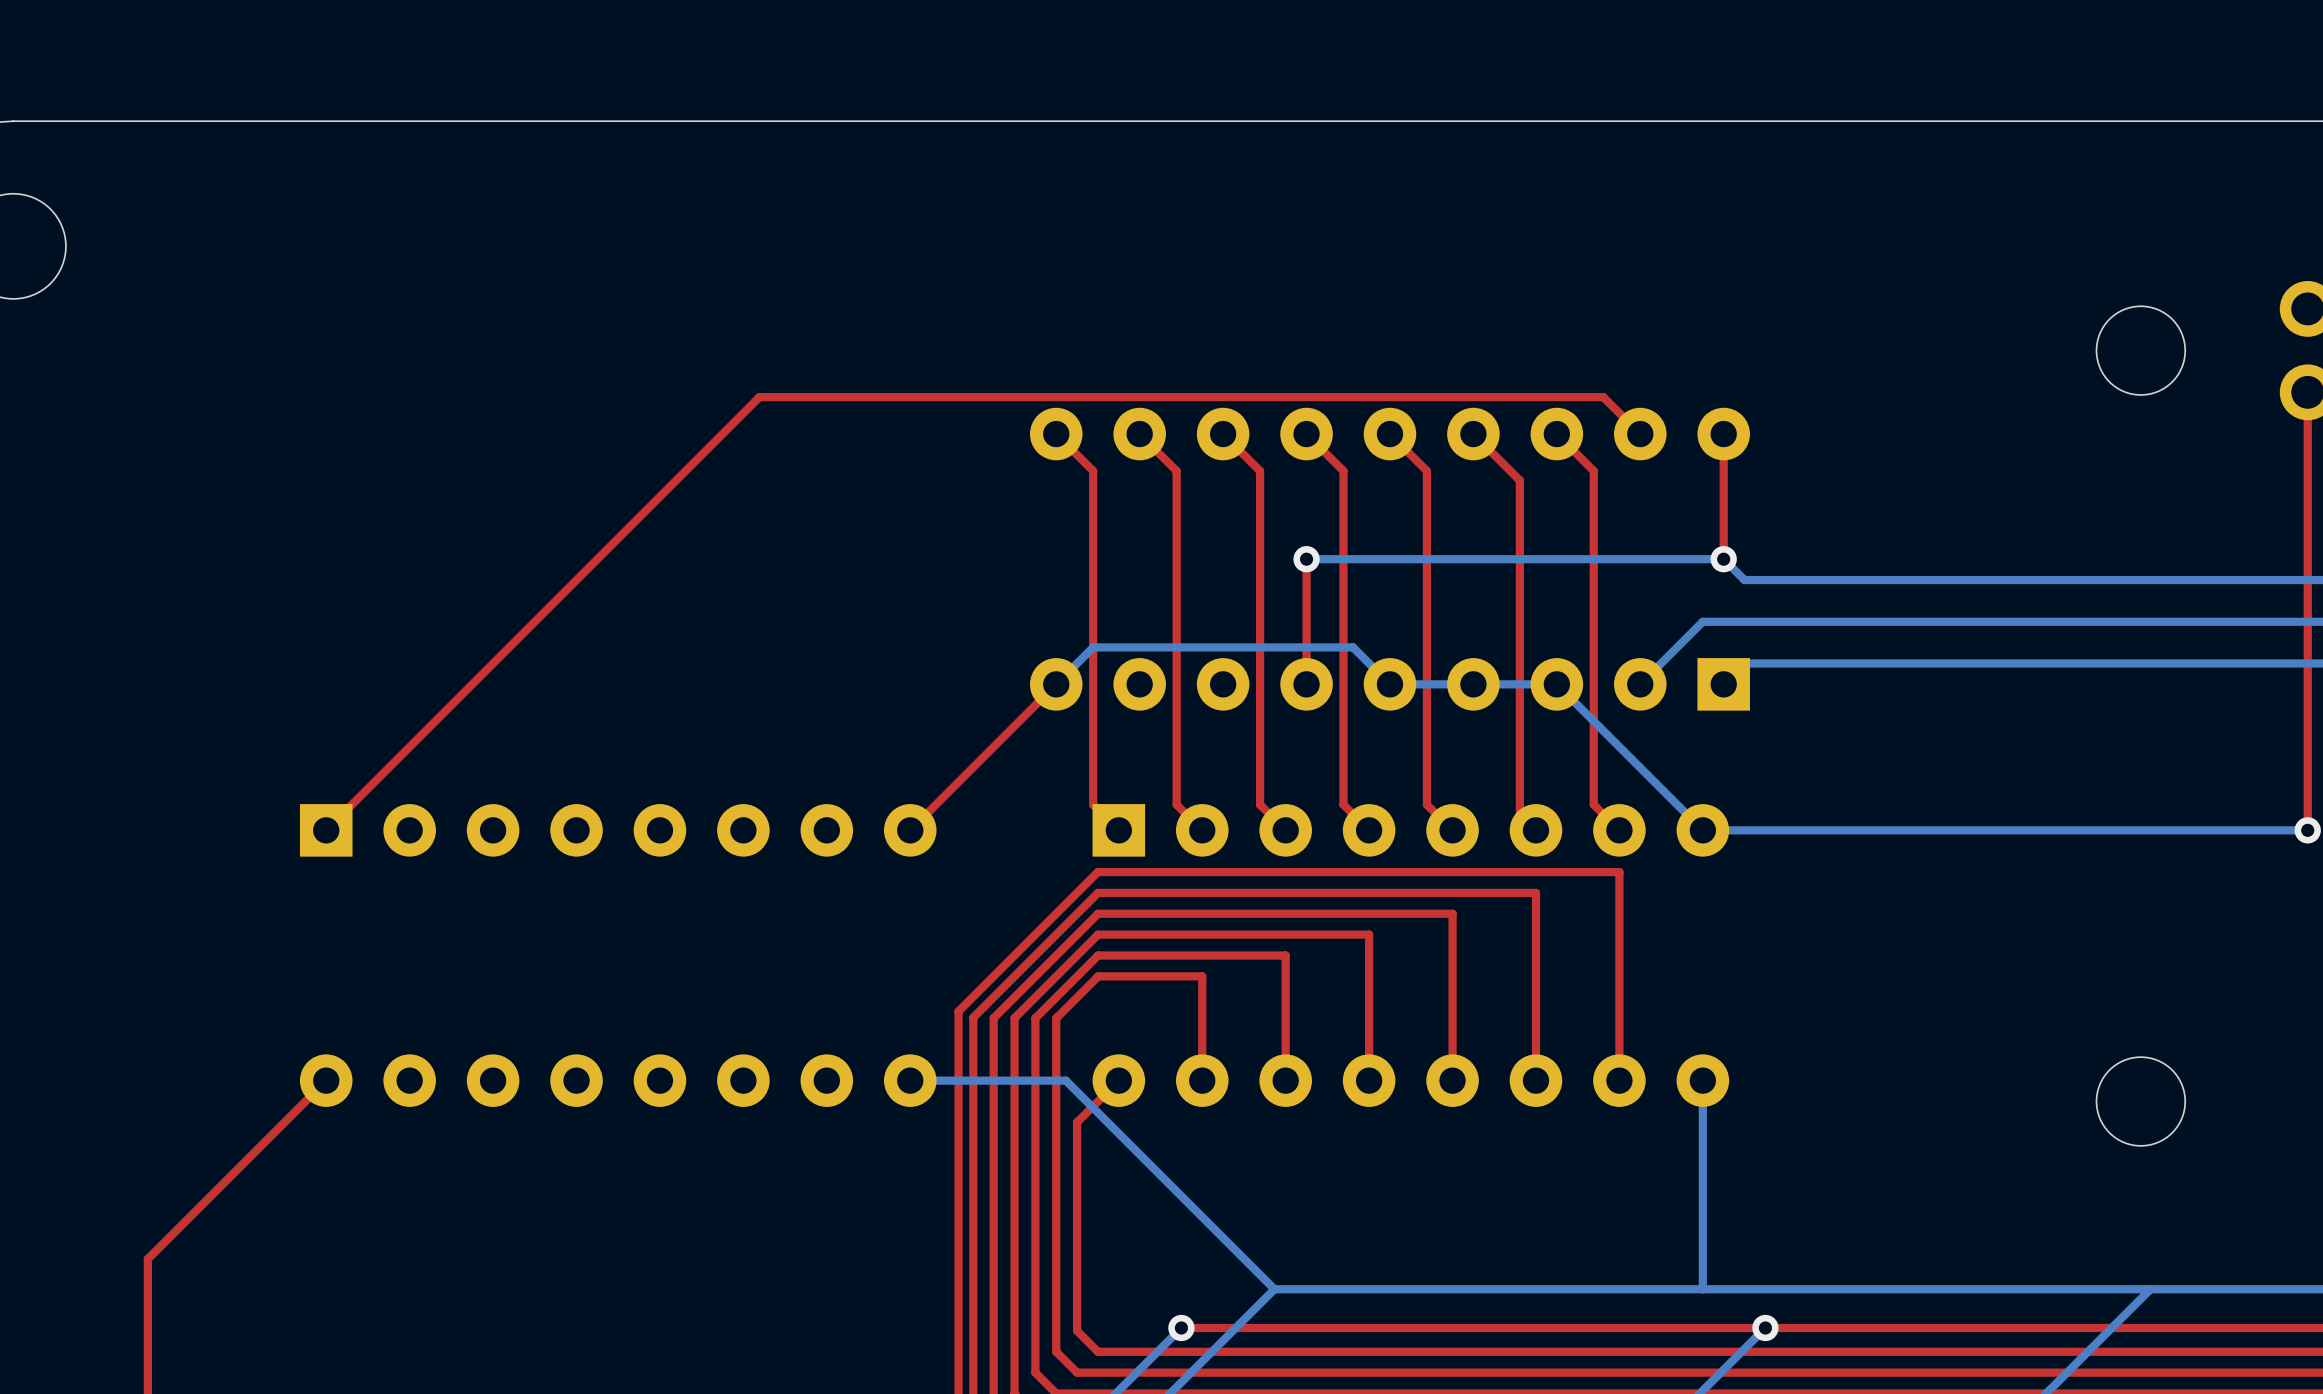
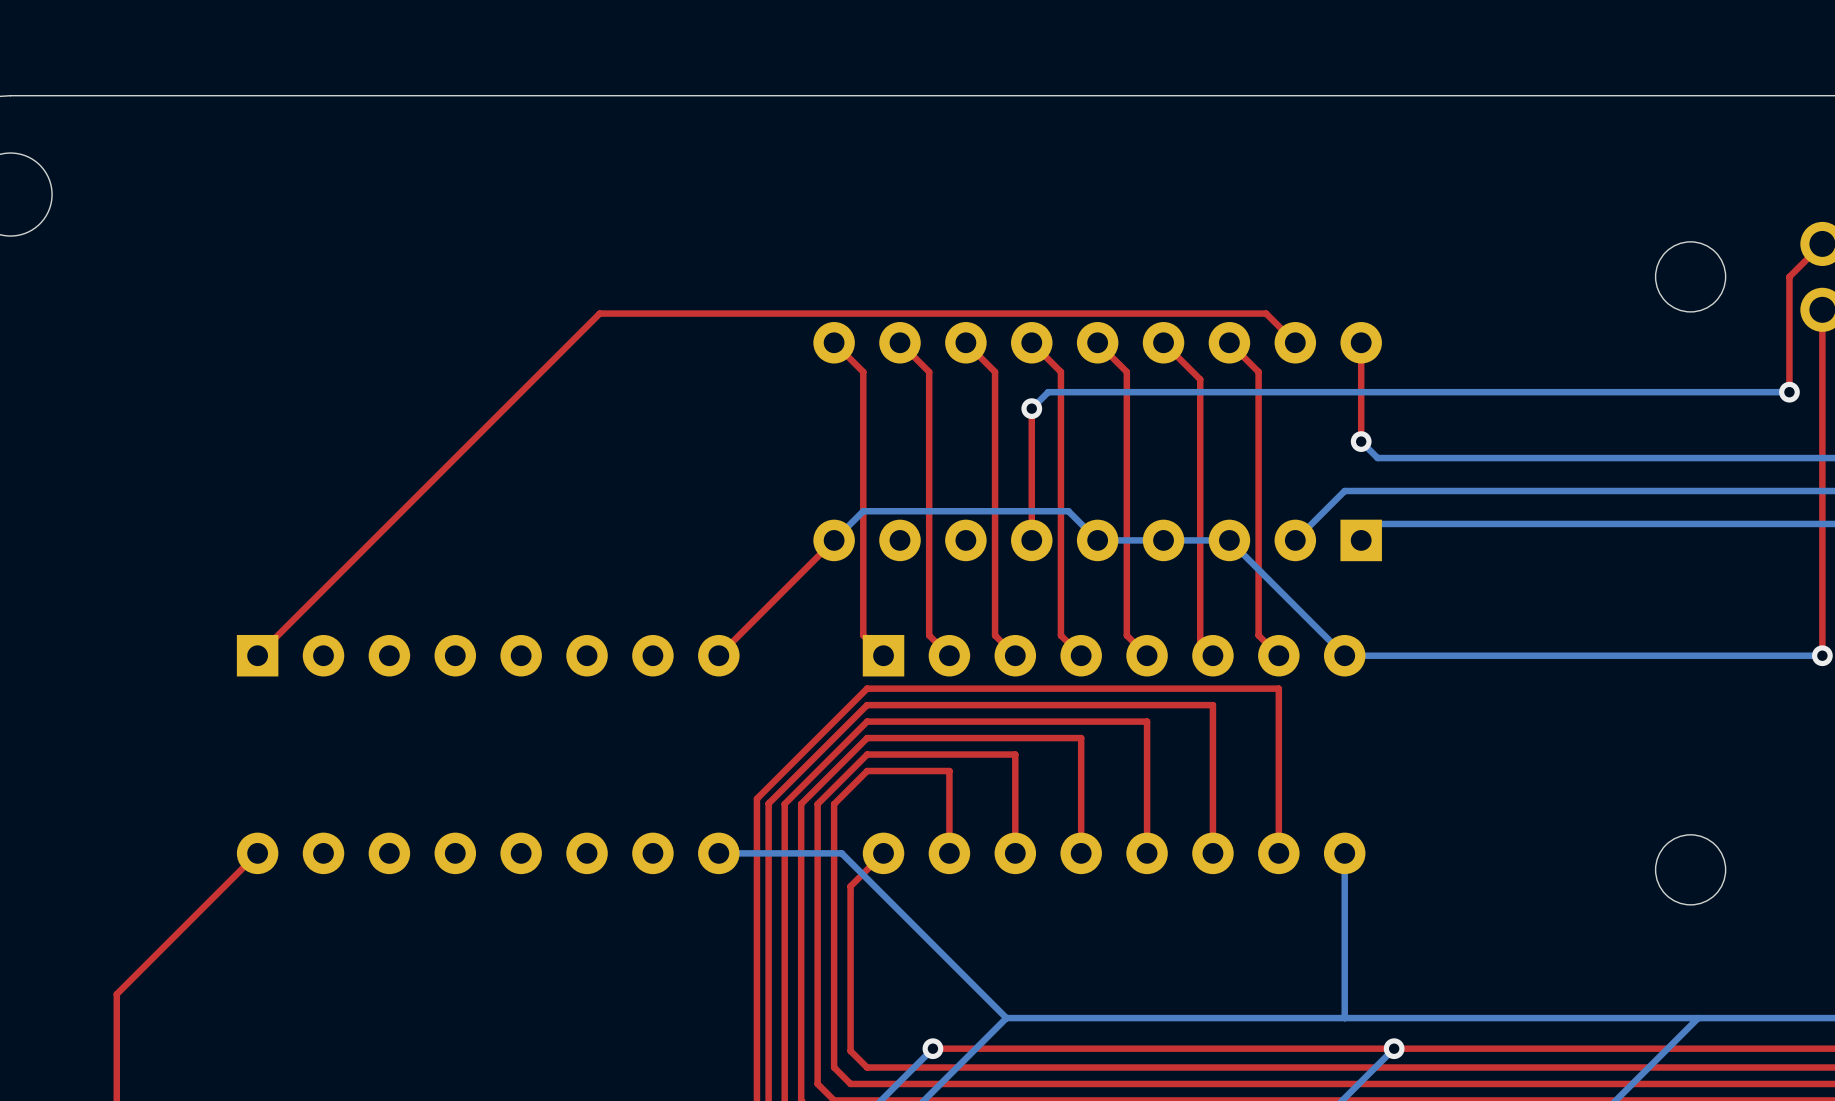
top track: none -> (1822, 243) (1789, 276) (1789, 392)
bottom track: none -> (1789, 392) (1048, 392) (1031, 408)
via: none -> (1789, 392)
top track: none -> (1031, 408) (1031, 441)
via position: (1306, 559) -> (1031, 408)
bottom track: (1723, 559) (1306, 559) -> none

